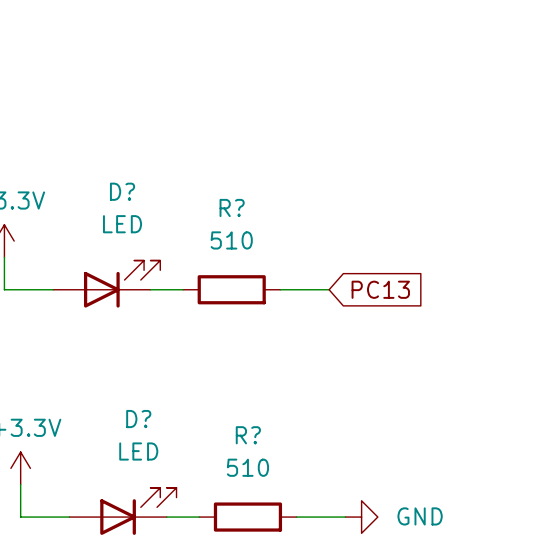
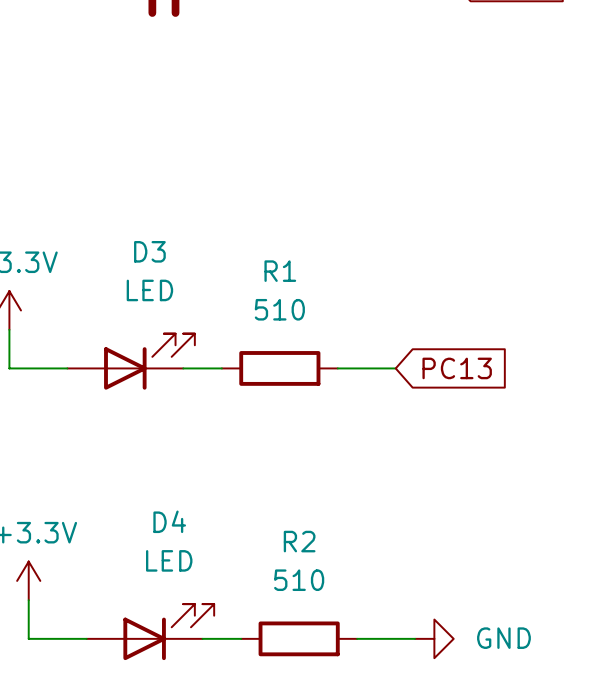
D? name: D? (122, 191) -> D3 (149, 251)
R? name: R? (232, 207) -> R1 (280, 271)
D? name: D? (138, 419) -> D4 (169, 521)
R? name: R? (248, 435) -> R2 (299, 541)

